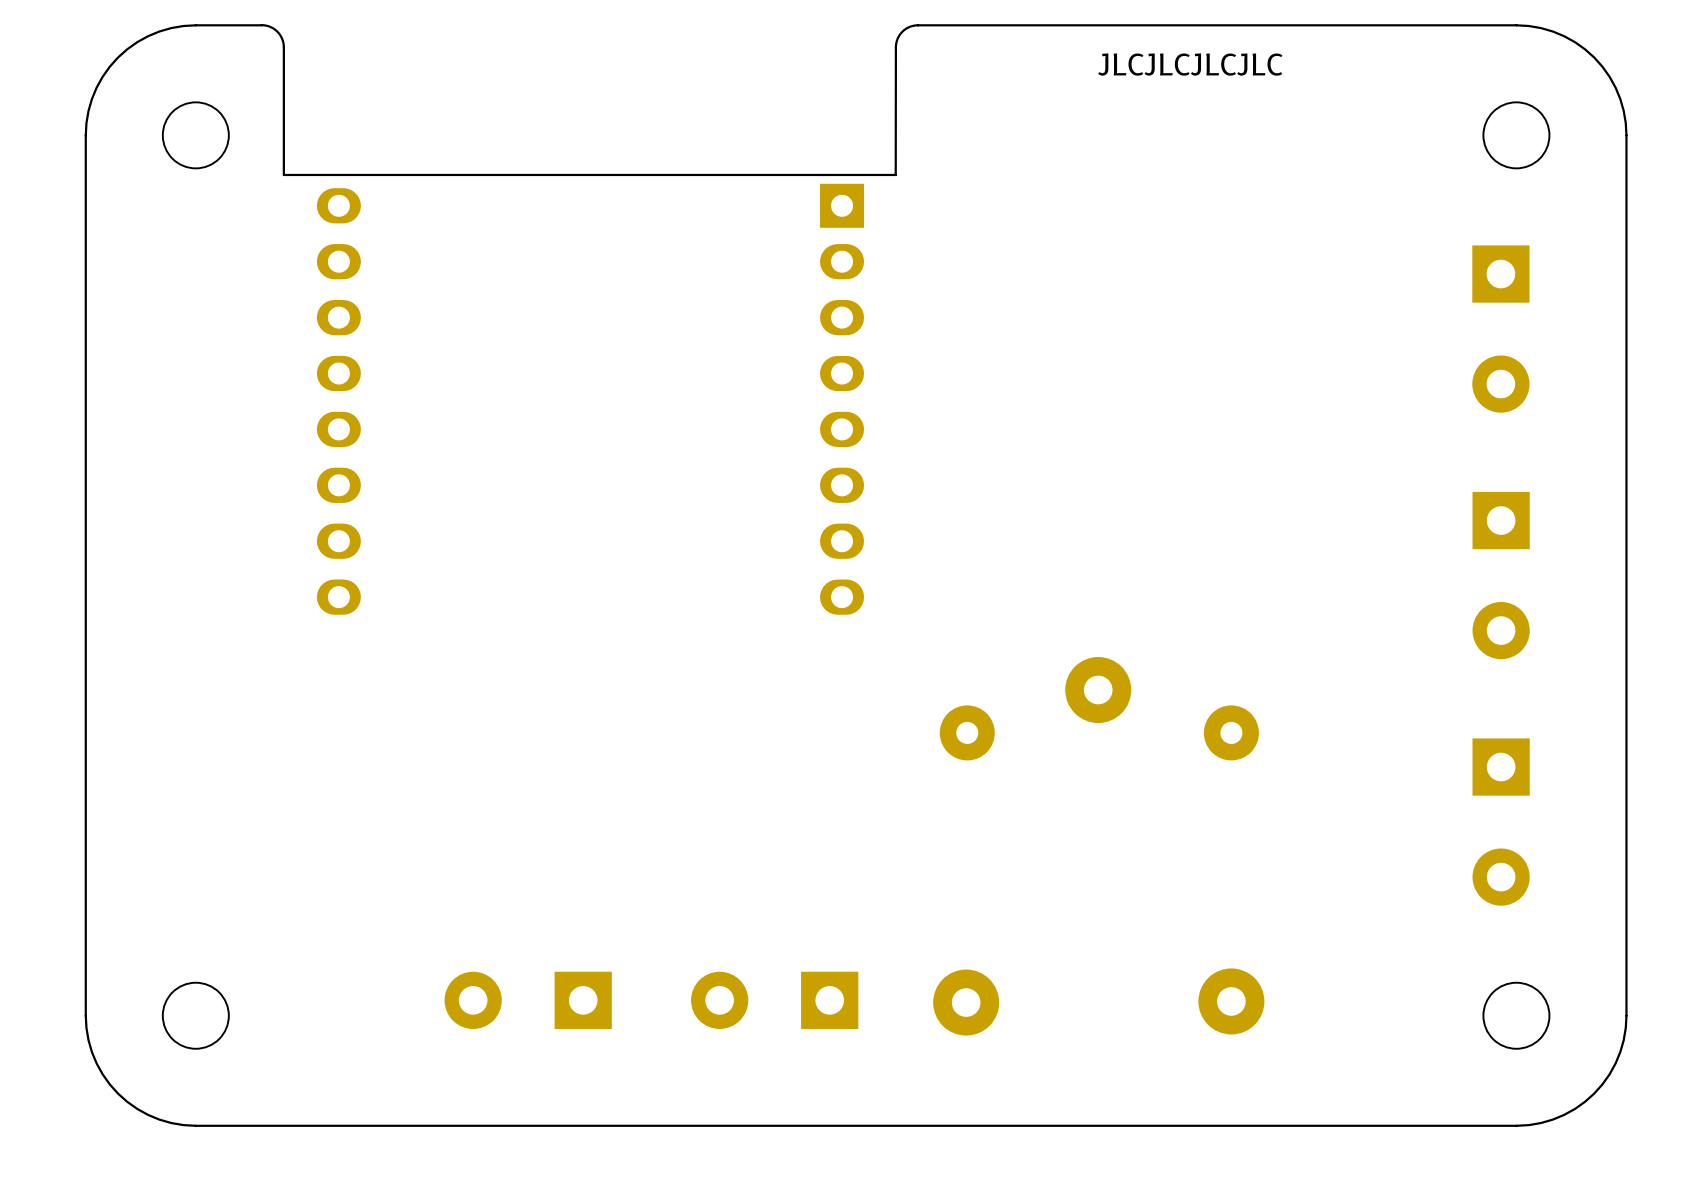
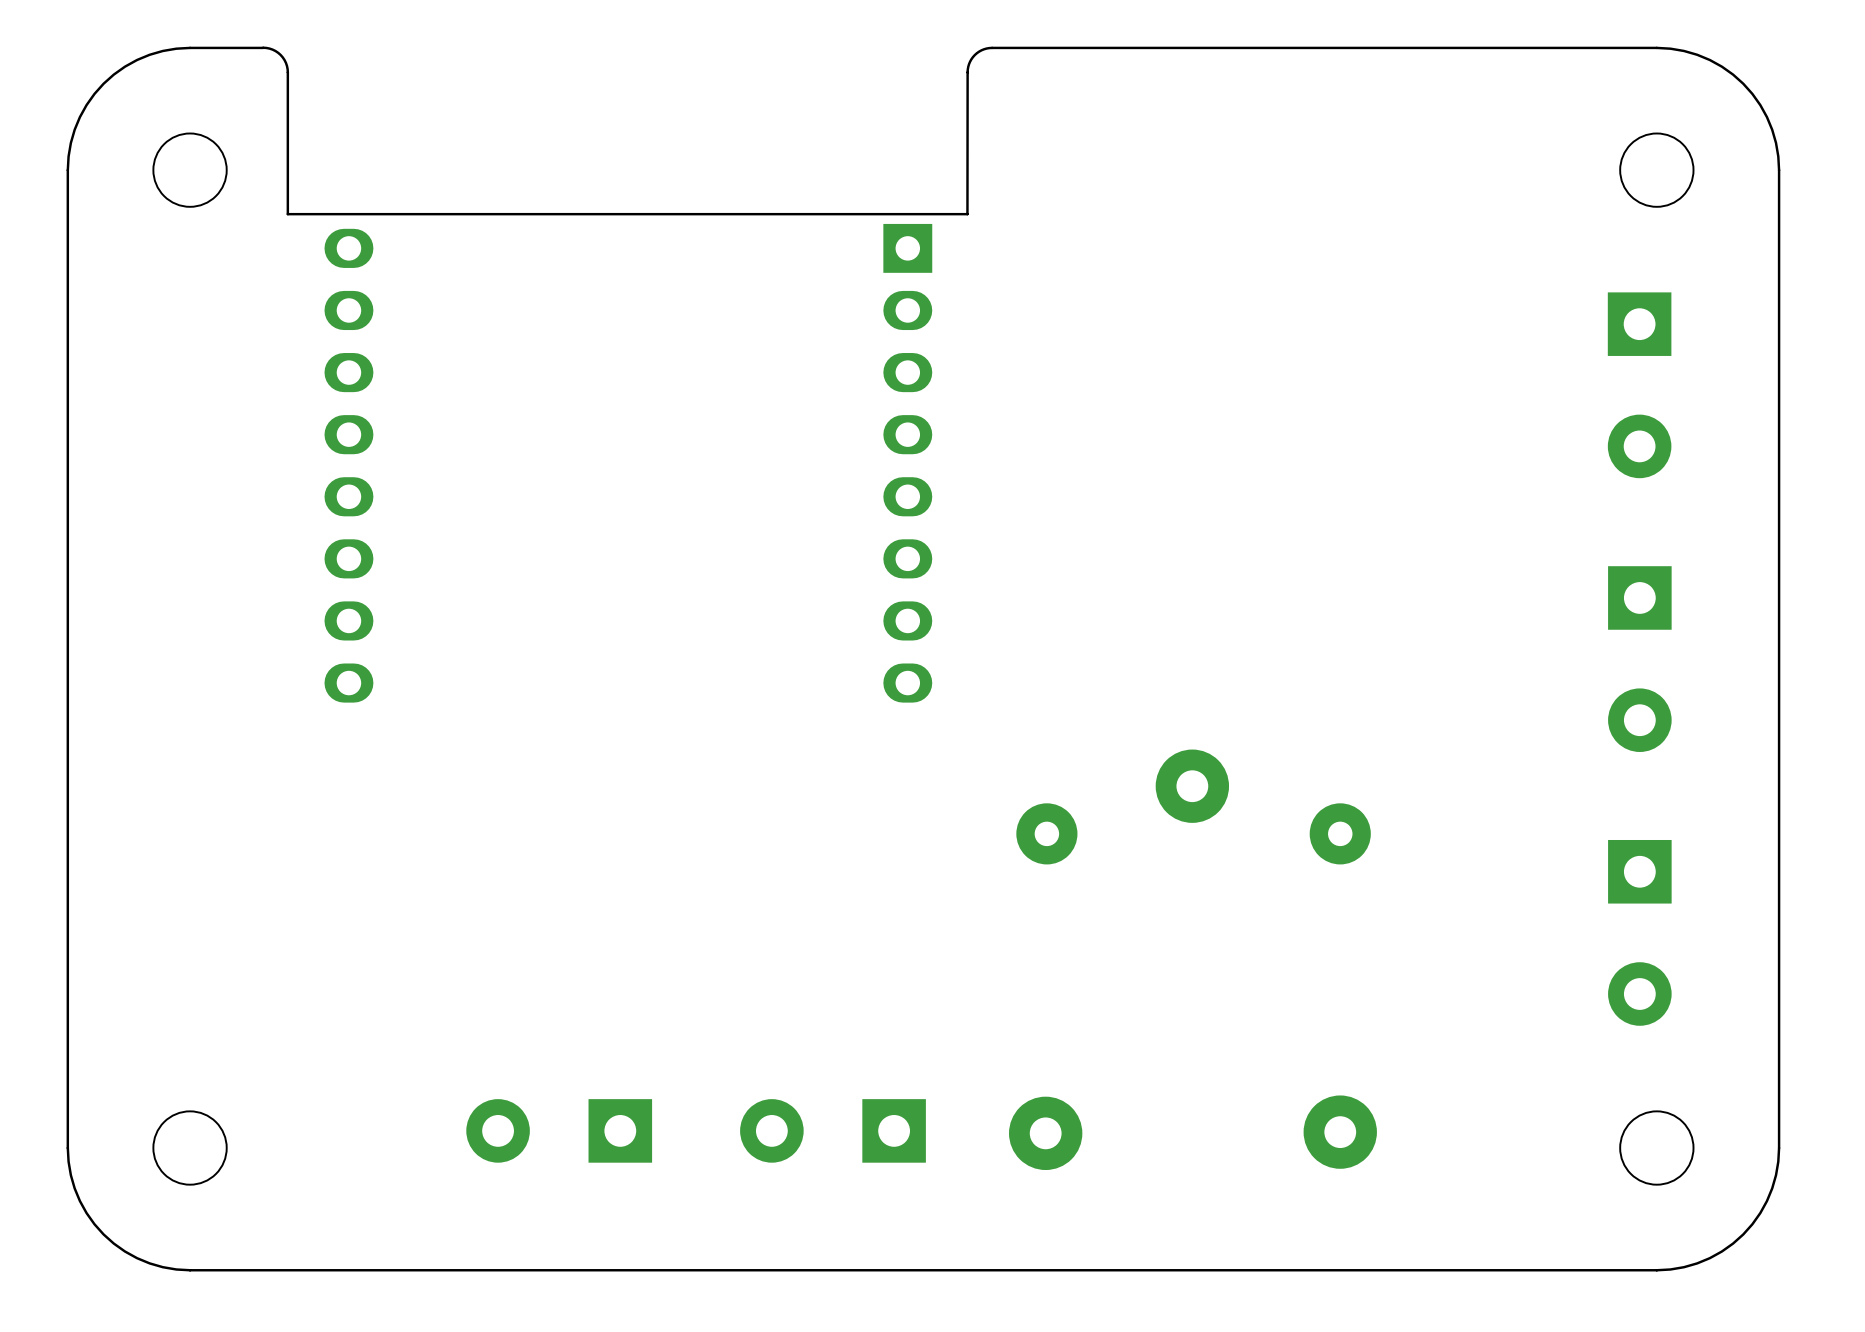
text: JLCJLCJLCJLC (1190, 64) -> none

